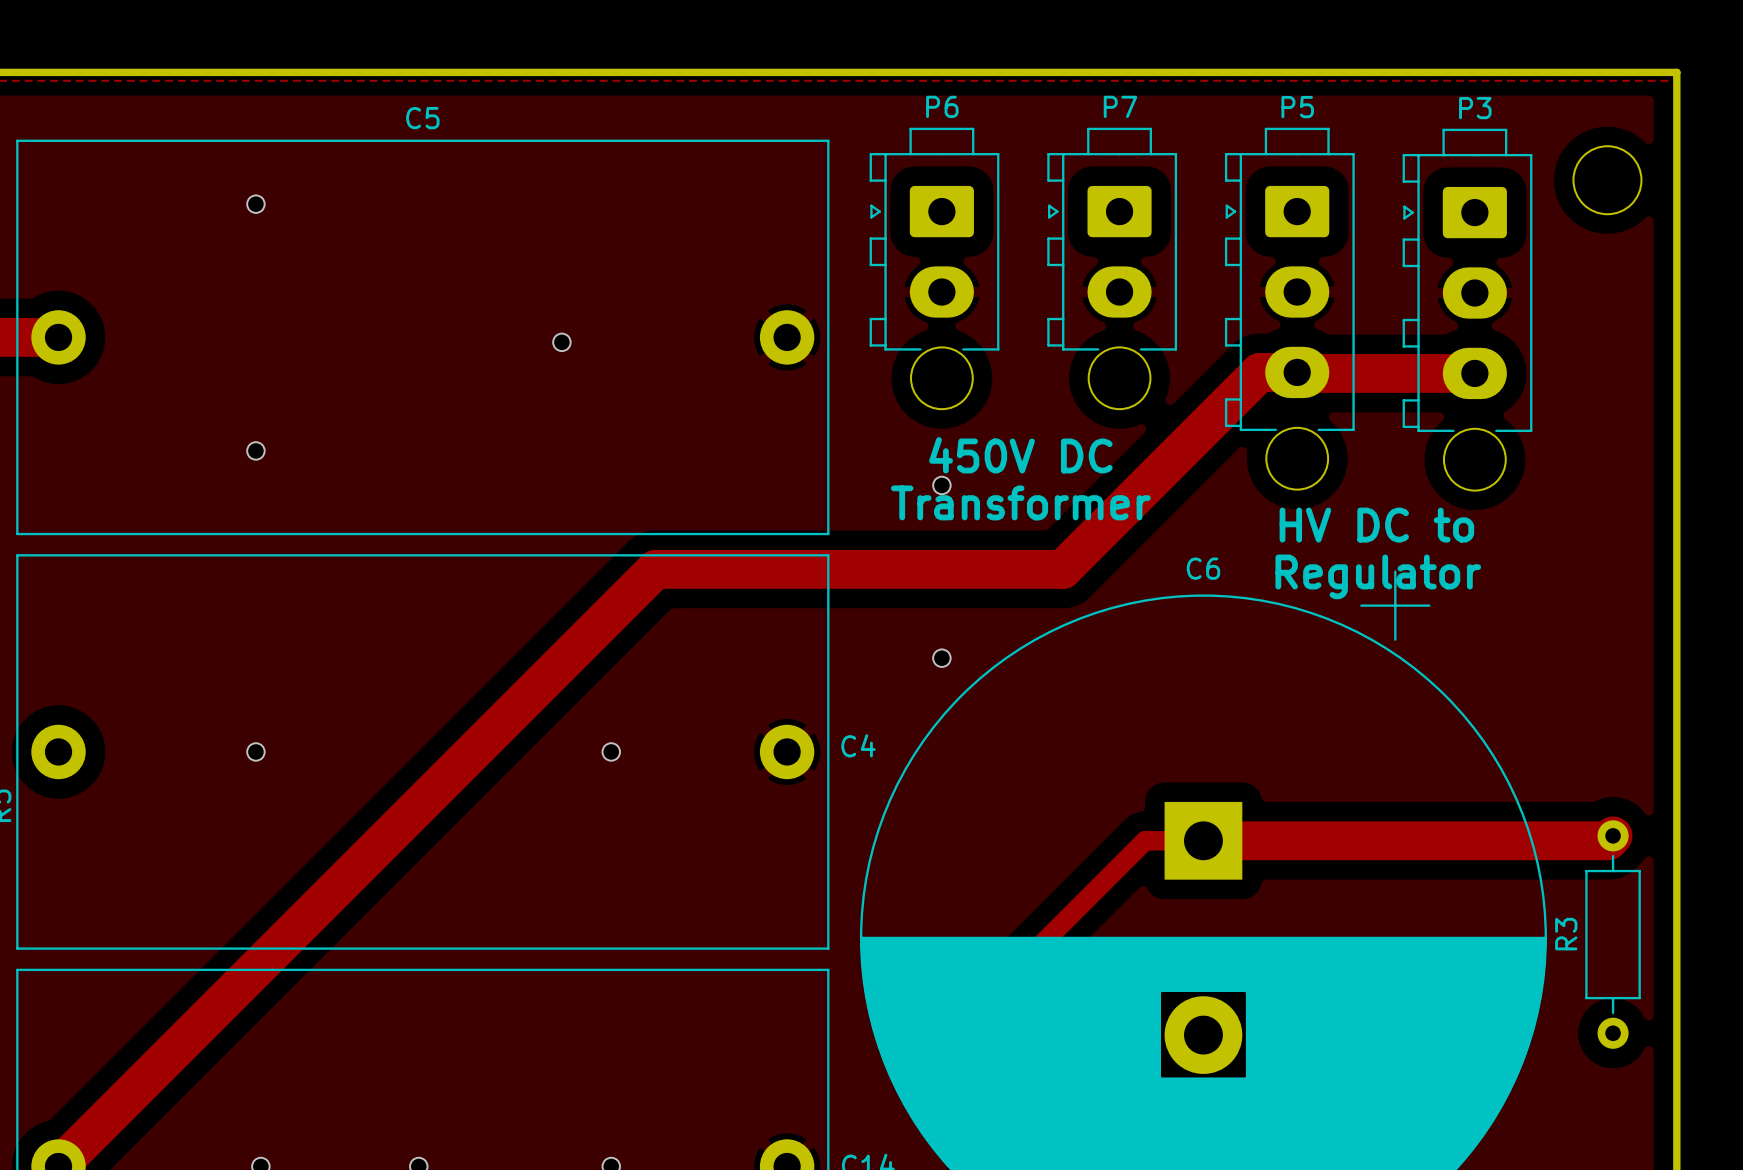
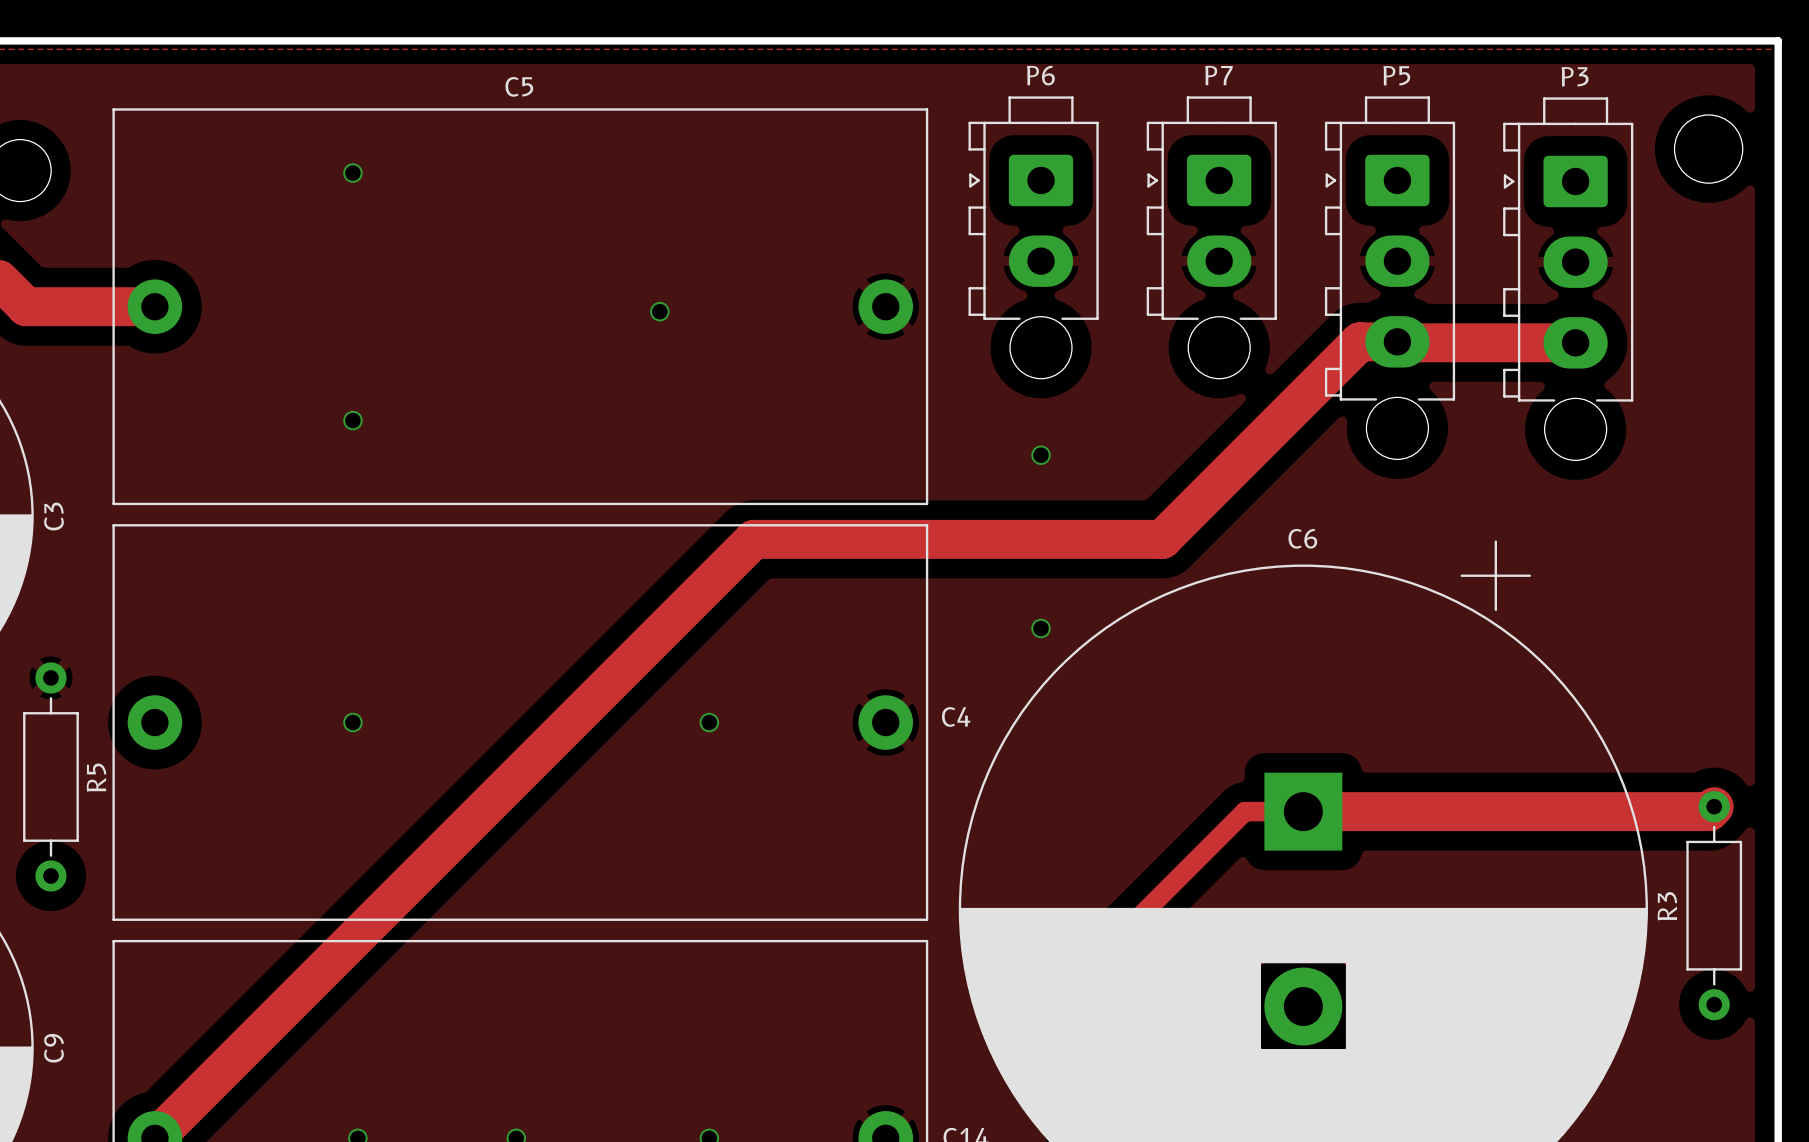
text: 450V DC (1020, 455) -> none
text: Transformer (1020, 502) -> none
text: HV DC to (1376, 525) -> none
text: Regulator (1378, 576) -> none

